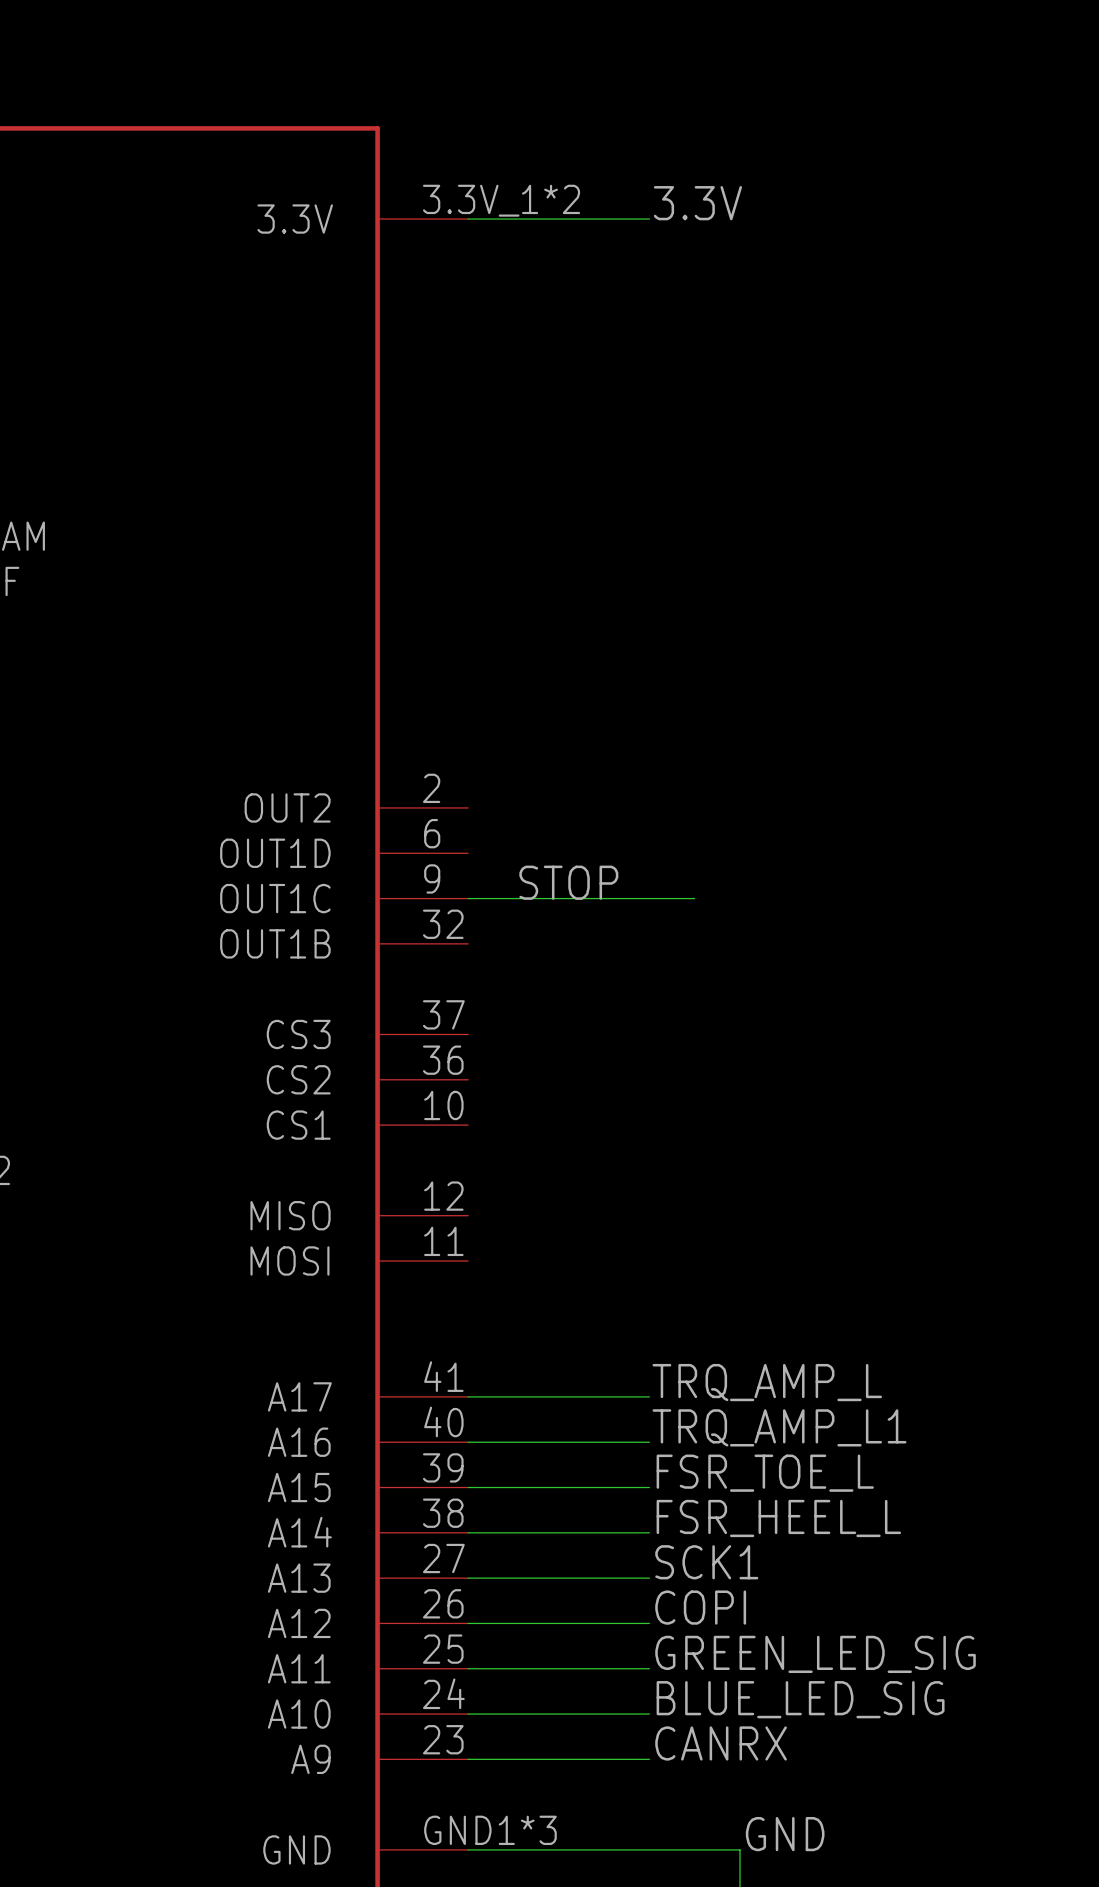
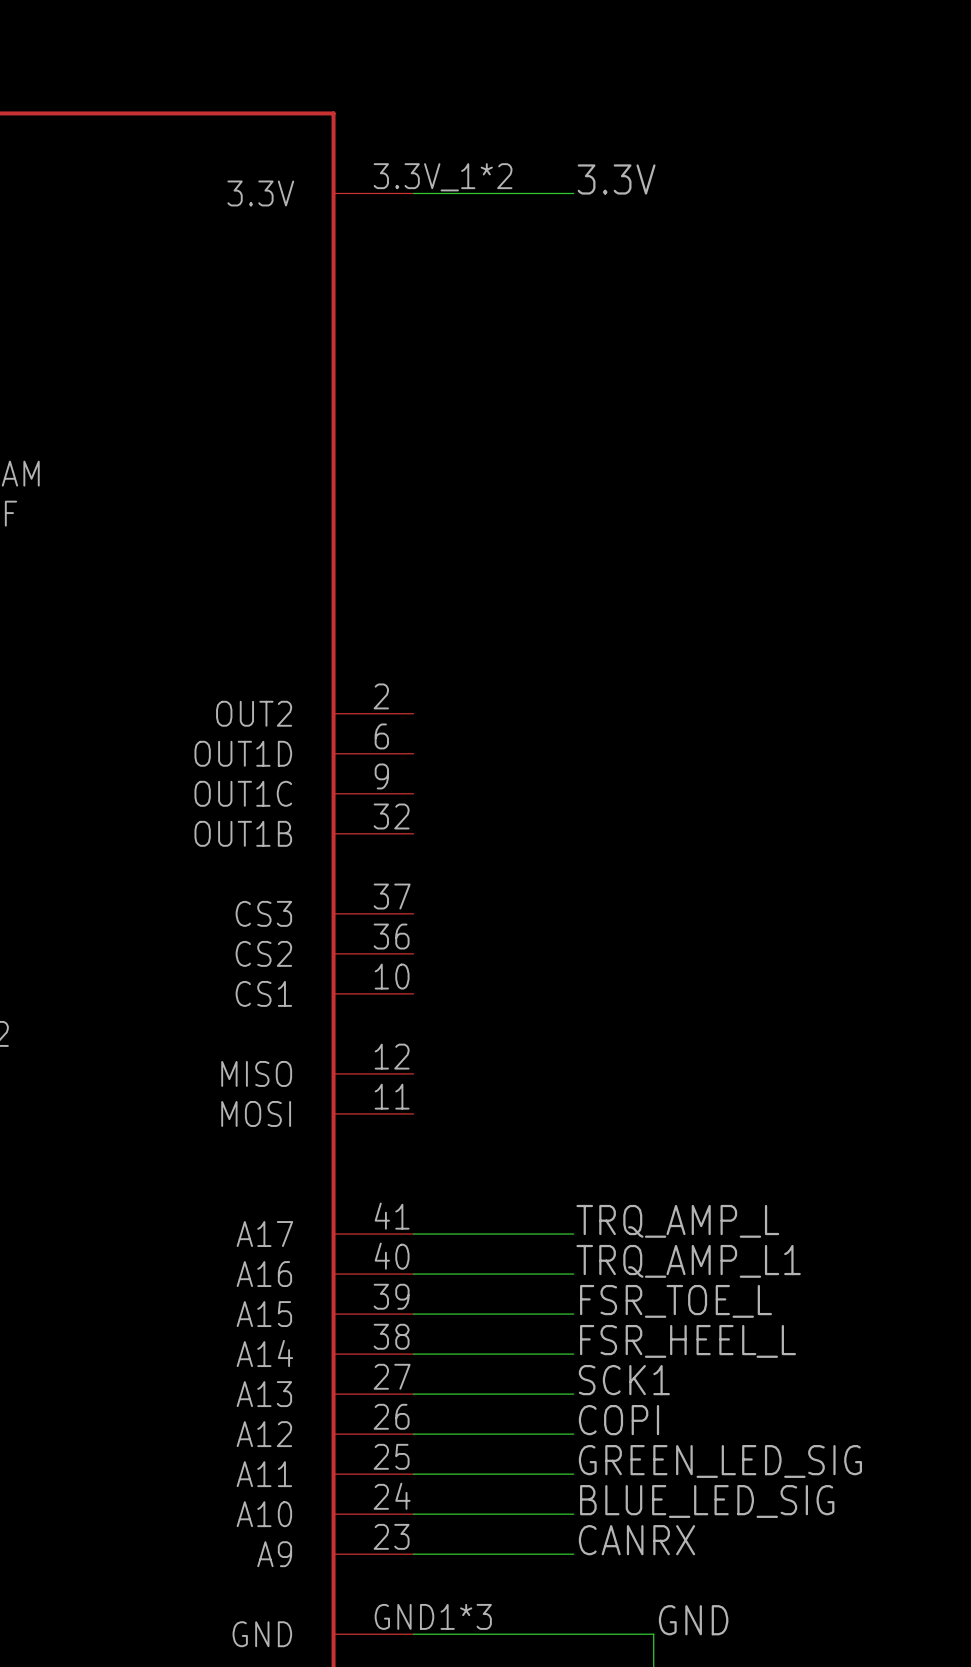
label: STOP (568, 882) -> none
wire: (468, 898) (694, 898) -> none

